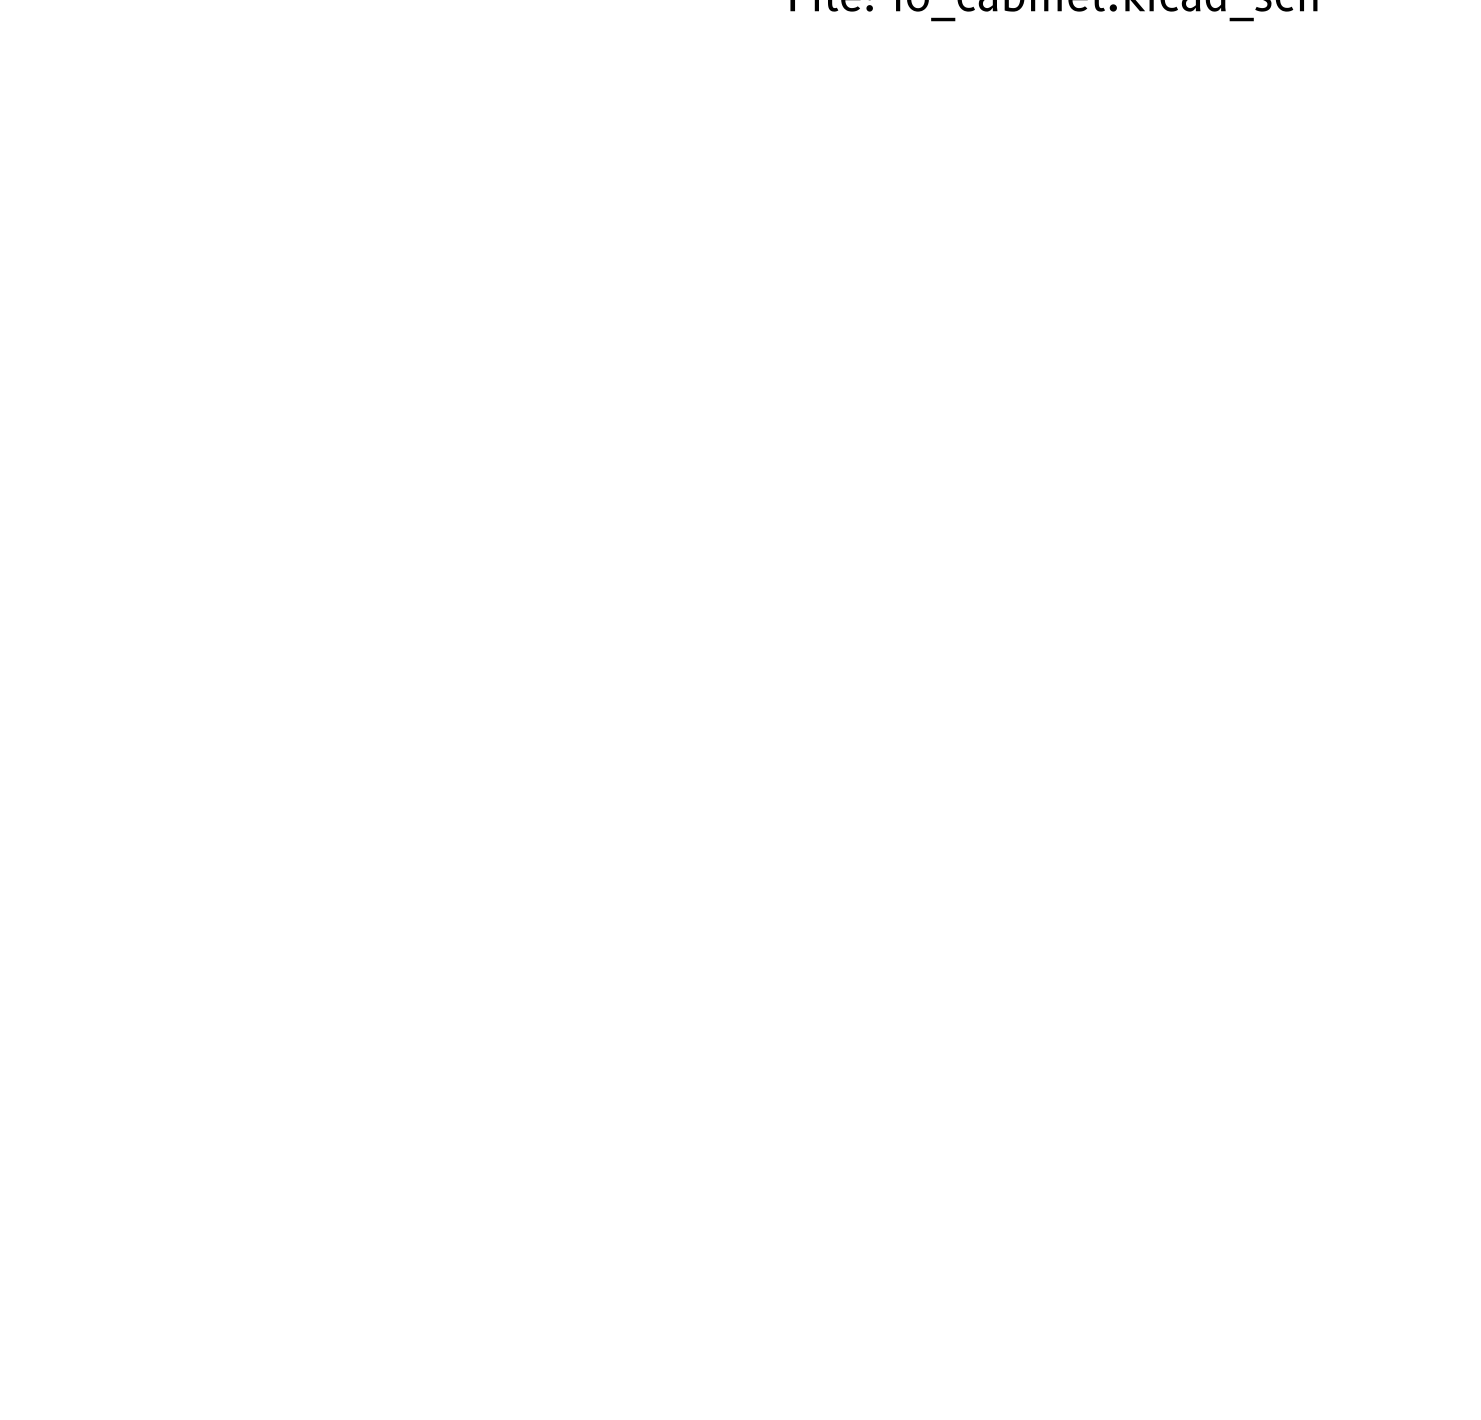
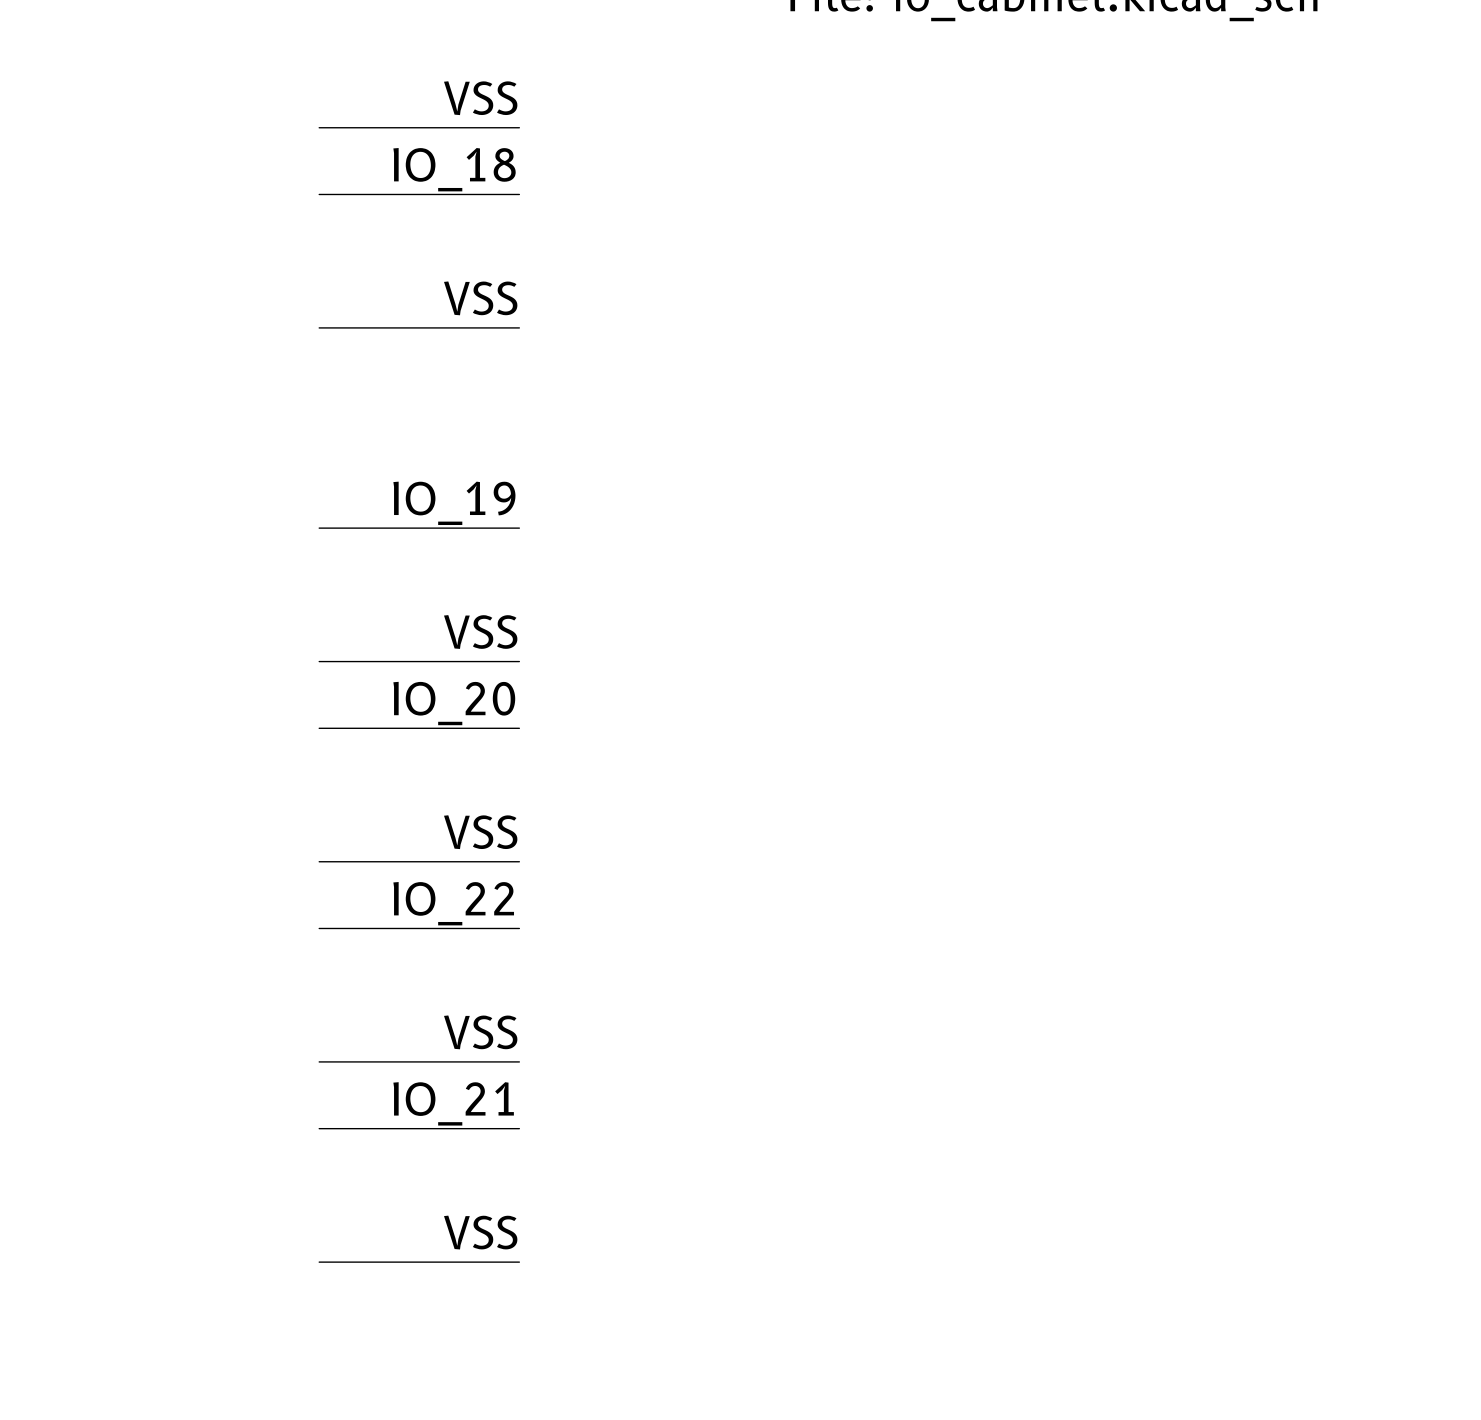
label: none -> VSS (480, 98)
wire: none -> (319, 127) (519, 127)
label: none -> IO_18 (454, 169)
wire: none -> (319, 194) (519, 194)
label: none -> VSS (480, 298)
wire: none -> (319, 327) (519, 327)
label: none -> IO_19 (454, 503)
wire: none -> (319, 528) (519, 528)
label: none -> VSS (480, 632)
wire: none -> (319, 661) (519, 661)
label: none -> IO_20 (454, 703)
wire: none -> (319, 728) (519, 728)
label: none -> VSS (480, 832)
wire: none -> (319, 861) (519, 861)
label: none -> IO_22 (453, 903)
wire: none -> (319, 928) (519, 928)
label: none -> VSS (480, 1032)
wire: none -> (319, 1061) (519, 1061)
label: none -> IO_21 (453, 1103)
wire: none -> (319, 1128) (519, 1128)
label: none -> VSS (480, 1232)
wire: none -> (319, 1262) (519, 1262)

